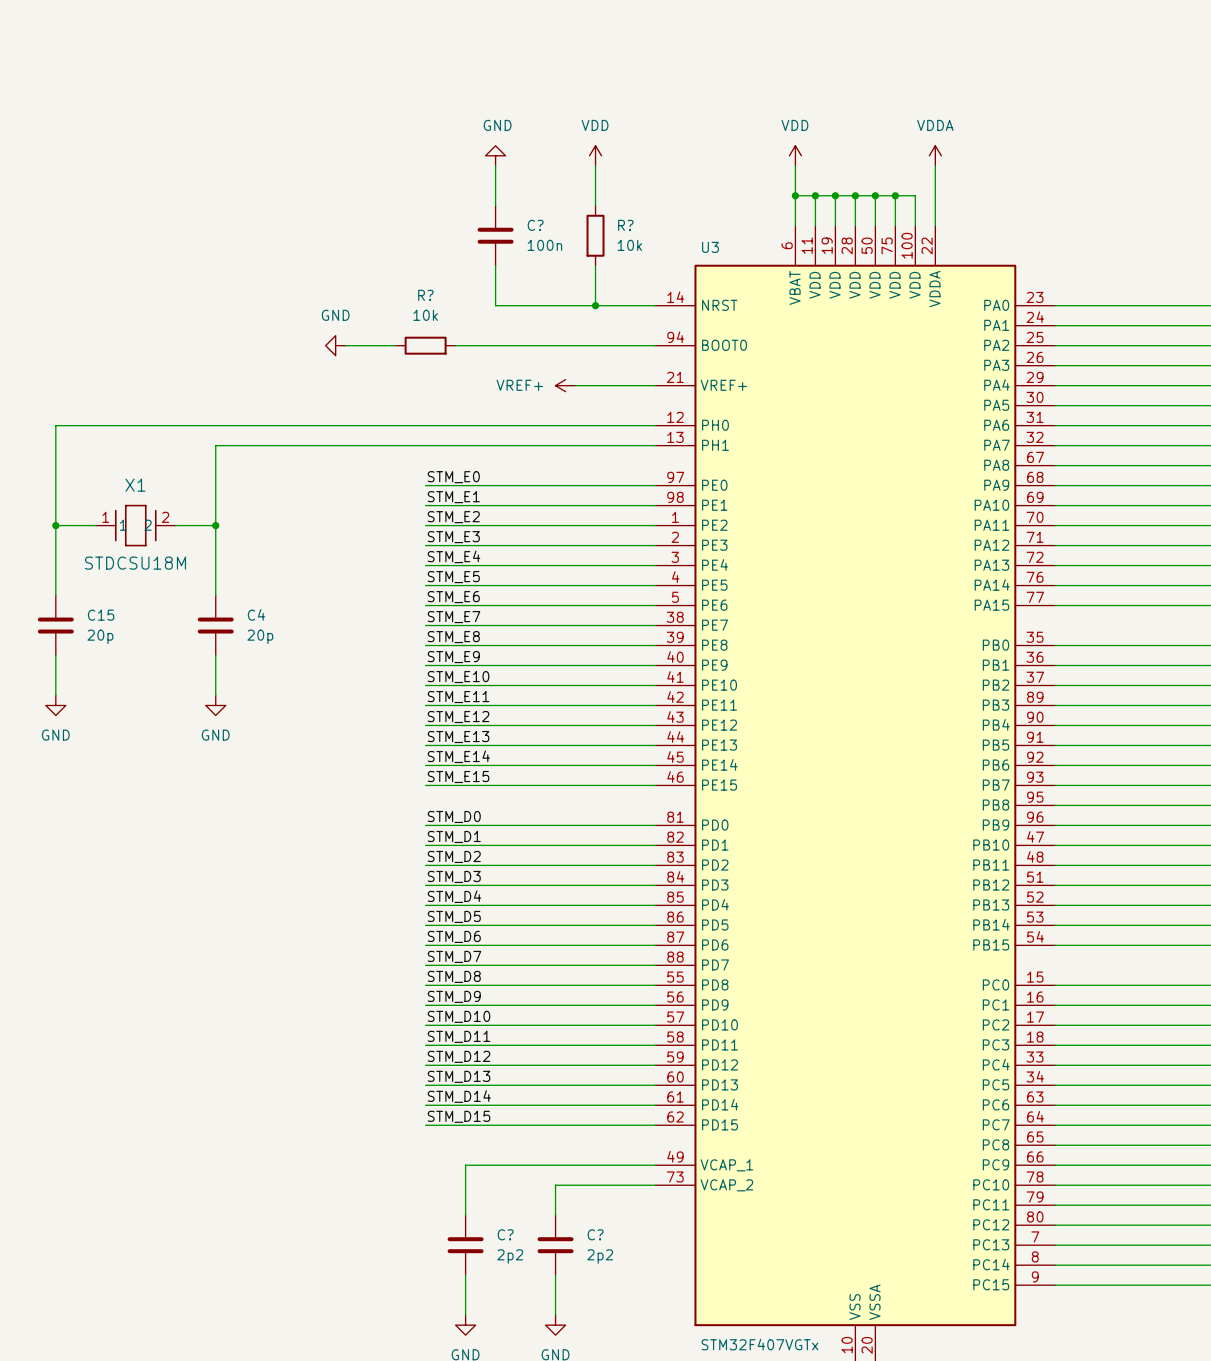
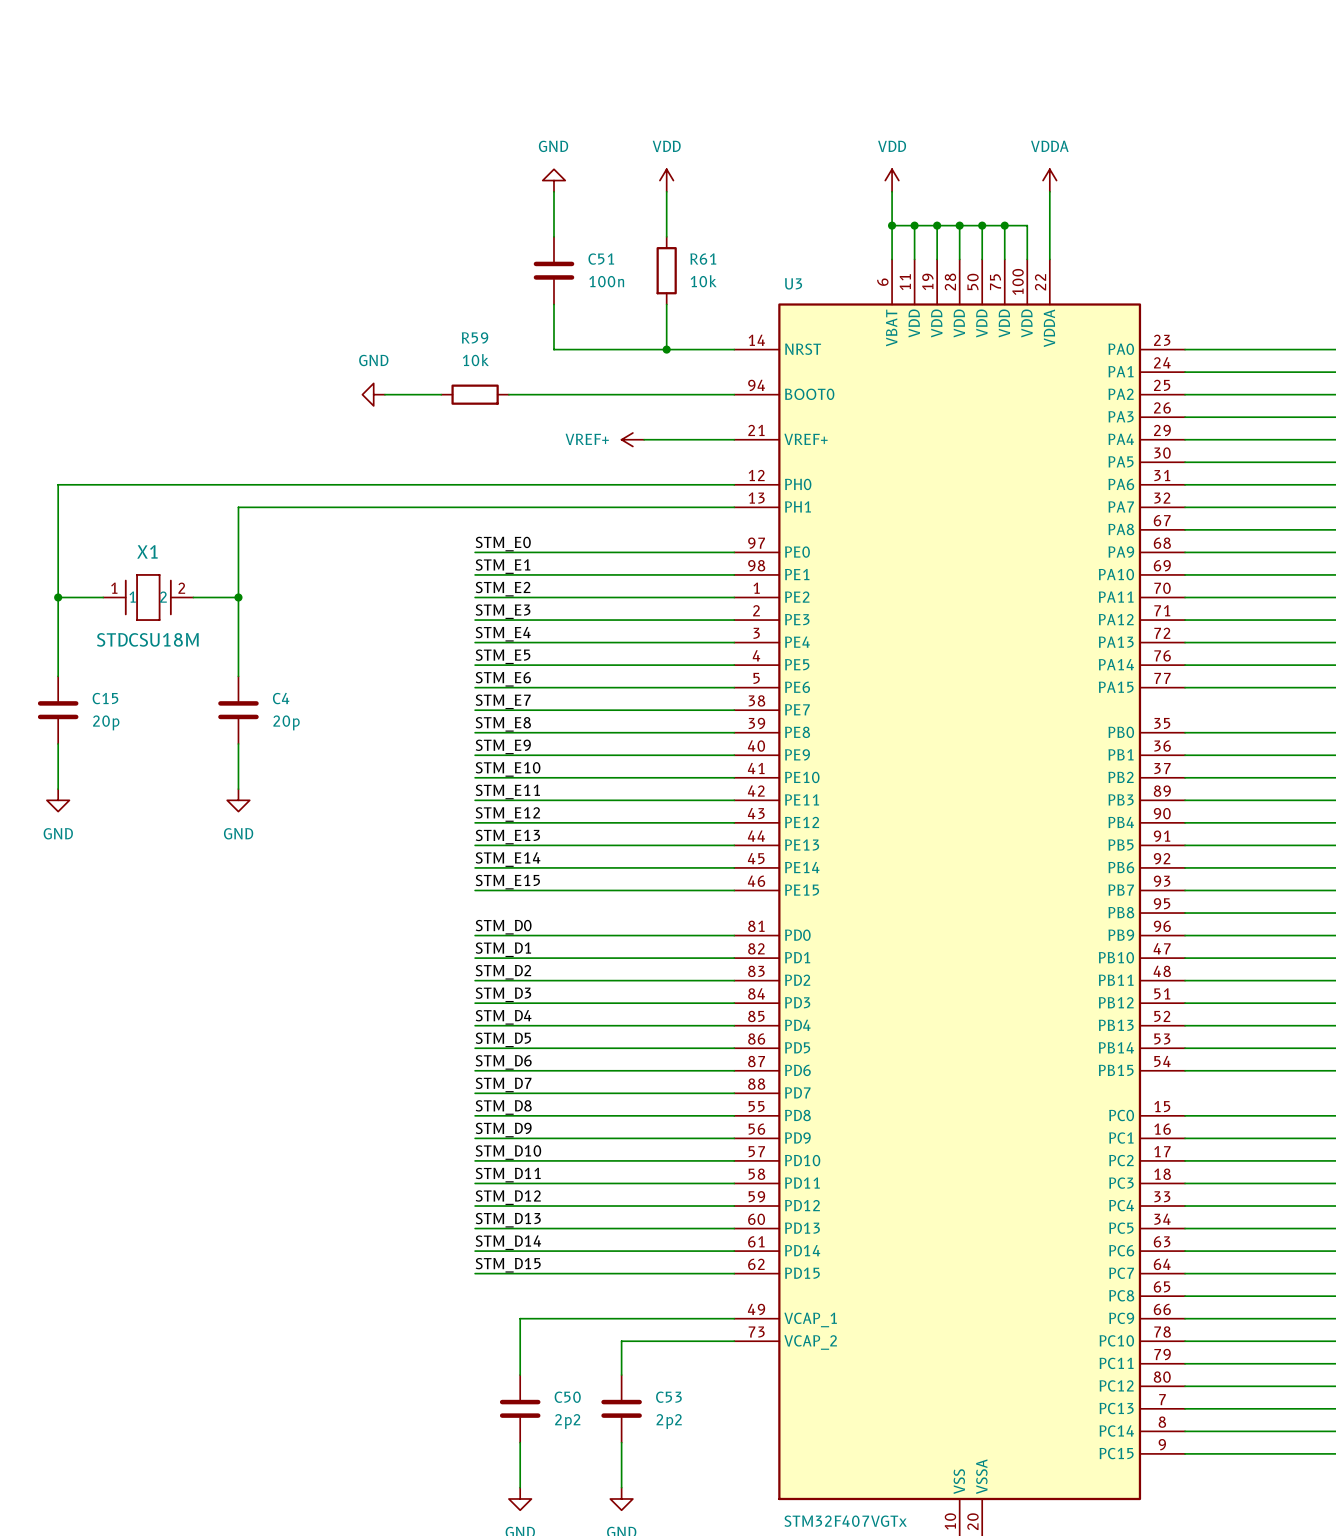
C? name: C? (535, 225) -> C51 (601, 259)
R? name: R? (625, 225) -> R61 (703, 259)
R? name: R? (425, 295) -> R59 (475, 337)
C? name: C? (505, 1234) -> C50 (567, 1397)
C? name: C? (595, 1234) -> C53 (668, 1397)

